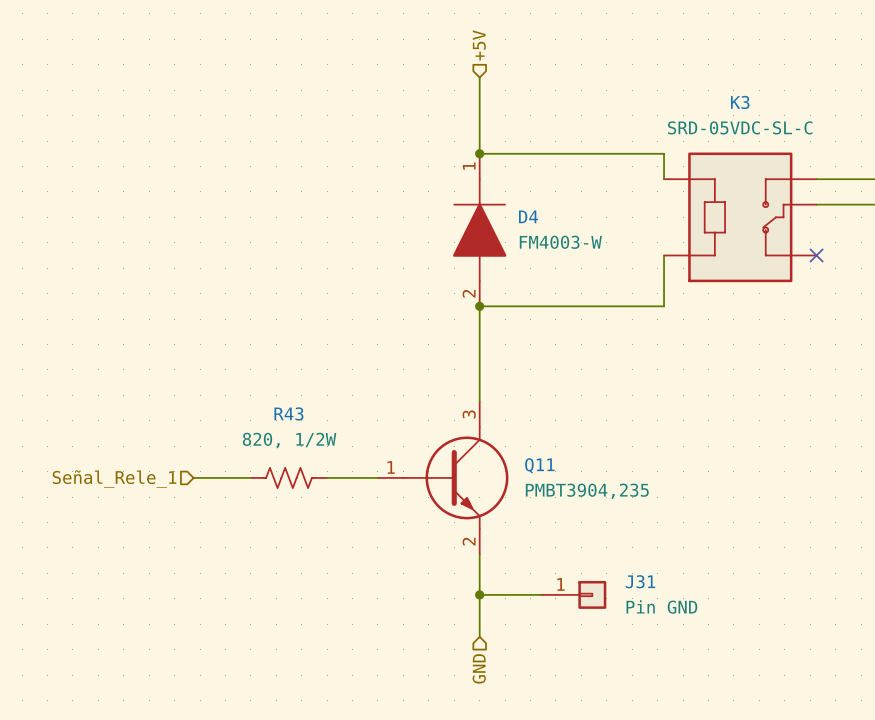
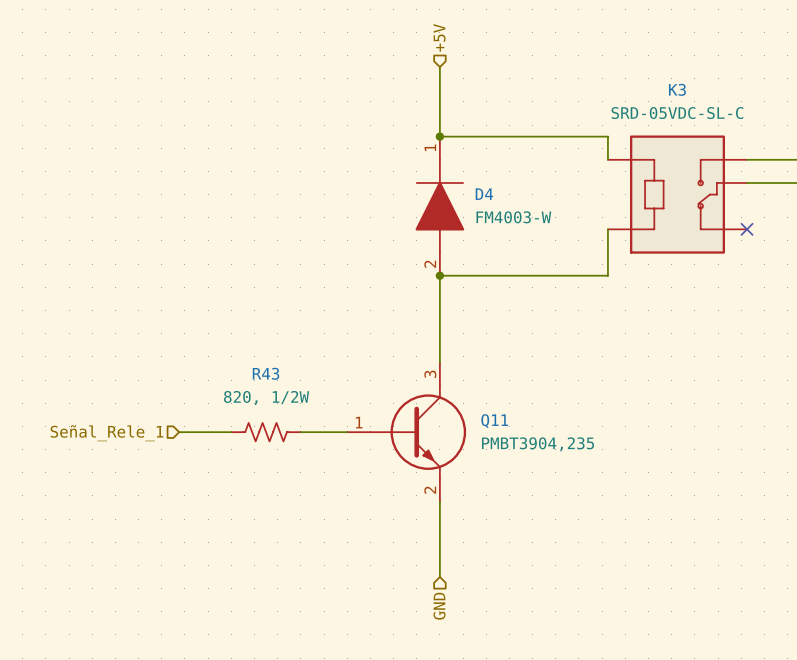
wire: (479, 594) (541, 594) -> none
junction: (479, 594) -> none
J31: Pin GND (573, 594) -> none

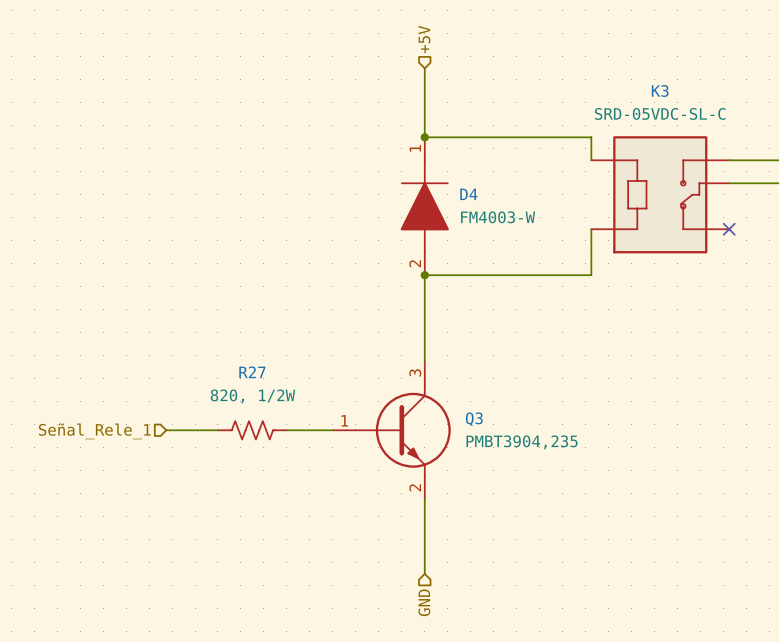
R43 name: R43 (266, 373) -> R27 (252, 372)
Q11 name: Q11 (494, 421) -> Q3 (474, 419)

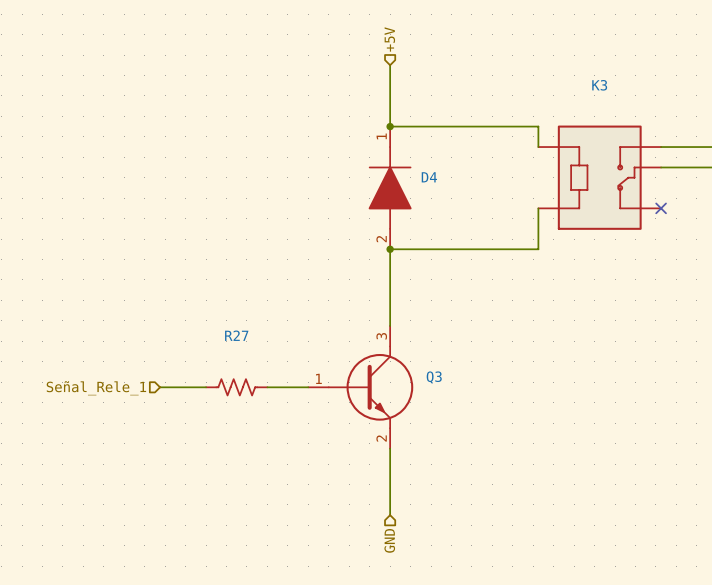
K3 value: SRD-05VDC-SL-C (660, 113) -> none
D4 value: FM4003-W (498, 217) -> none
R27 value: 820, 1/2W (252, 396) -> none
Q3 value: PMBT3904,235 (522, 442) -> none

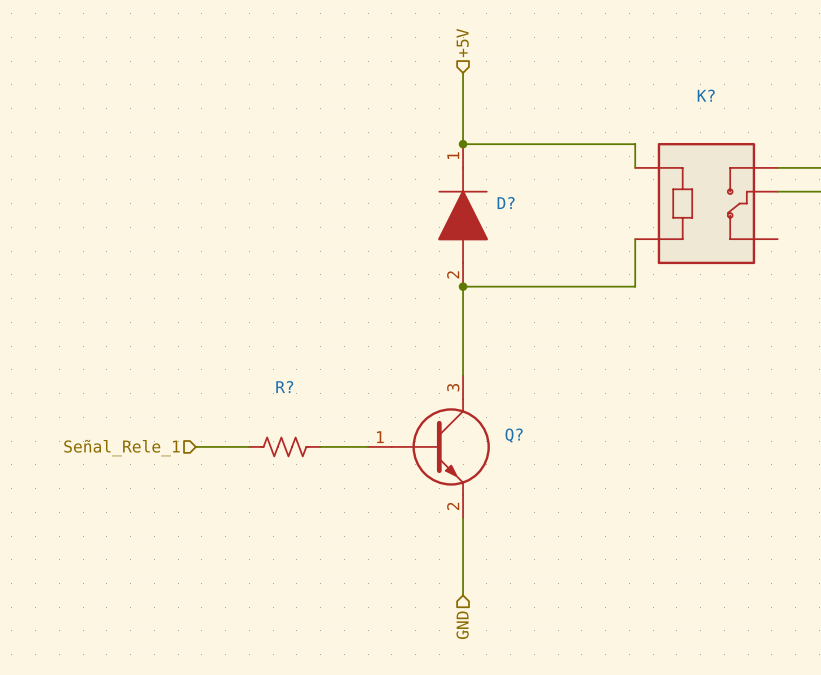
K3 name: K3 (599, 85) -> K? (706, 95)
D4 name: D4 (429, 177) -> D? (506, 202)
no-connect mark: (661, 208) -> none
R27 name: R27 (236, 335) -> R? (284, 387)
Q3 name: Q3 (434, 377) -> Q? (514, 435)

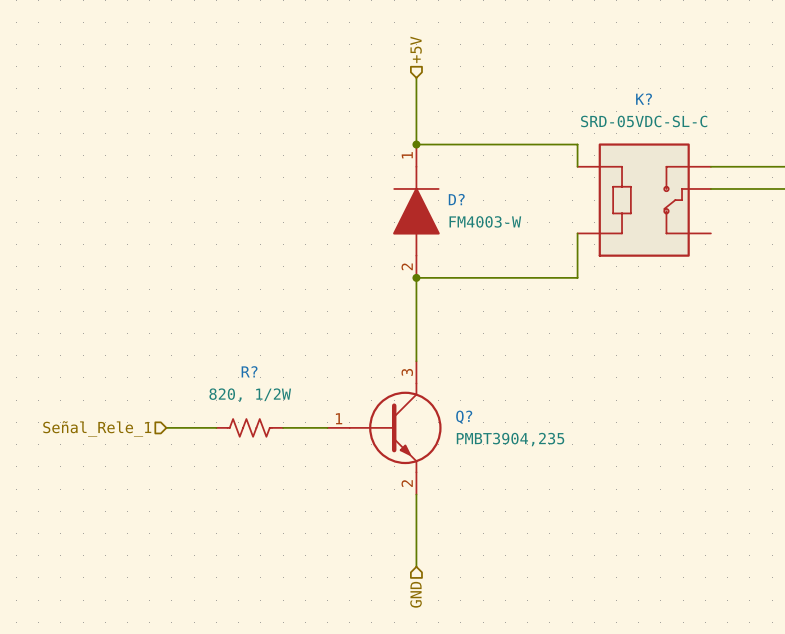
K? value: none -> SRD-05VDC-SL-C (644, 121)
D? value: none -> FM4003-W (485, 221)
R? value: none -> 820, 1/2W (250, 395)
Q? value: none -> PMBT3904,235 (510, 439)

